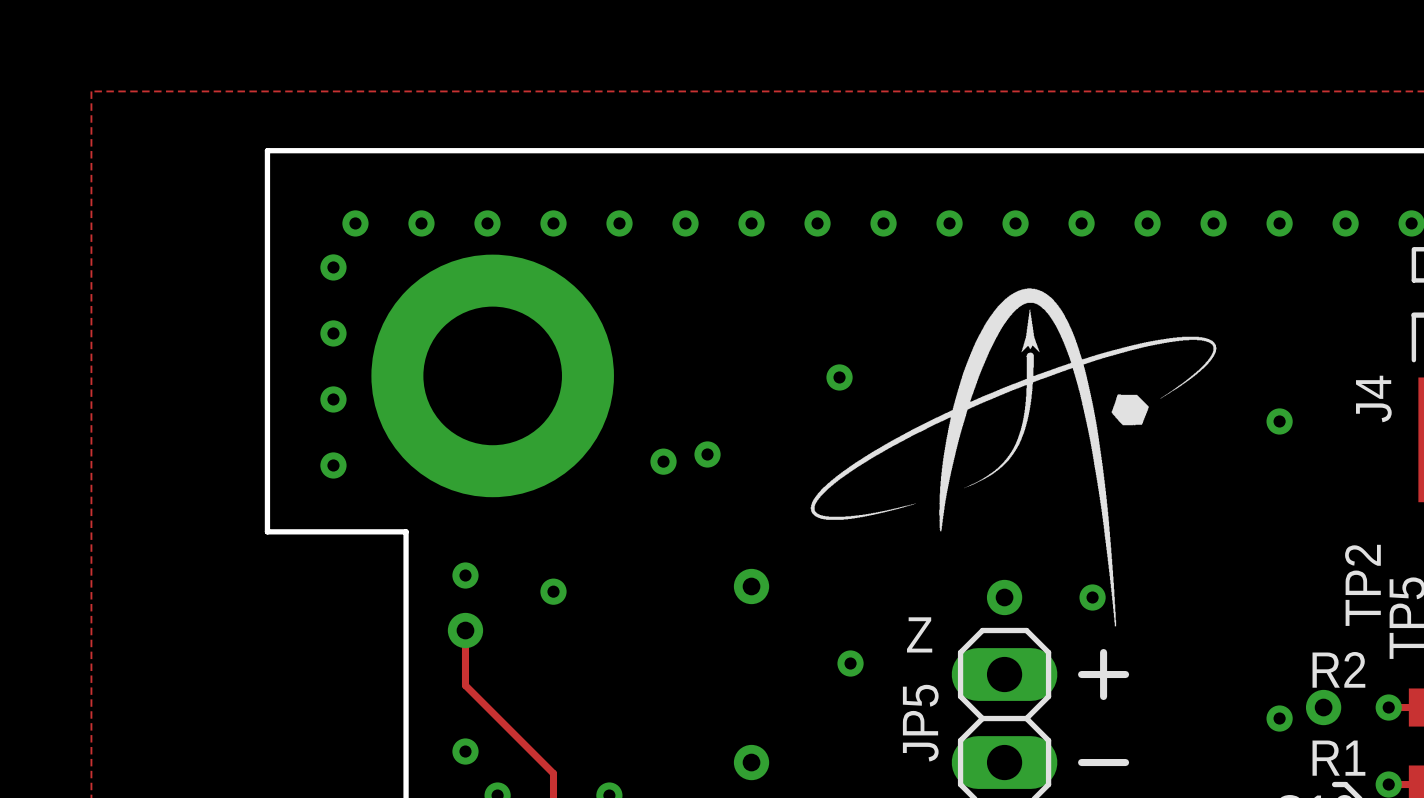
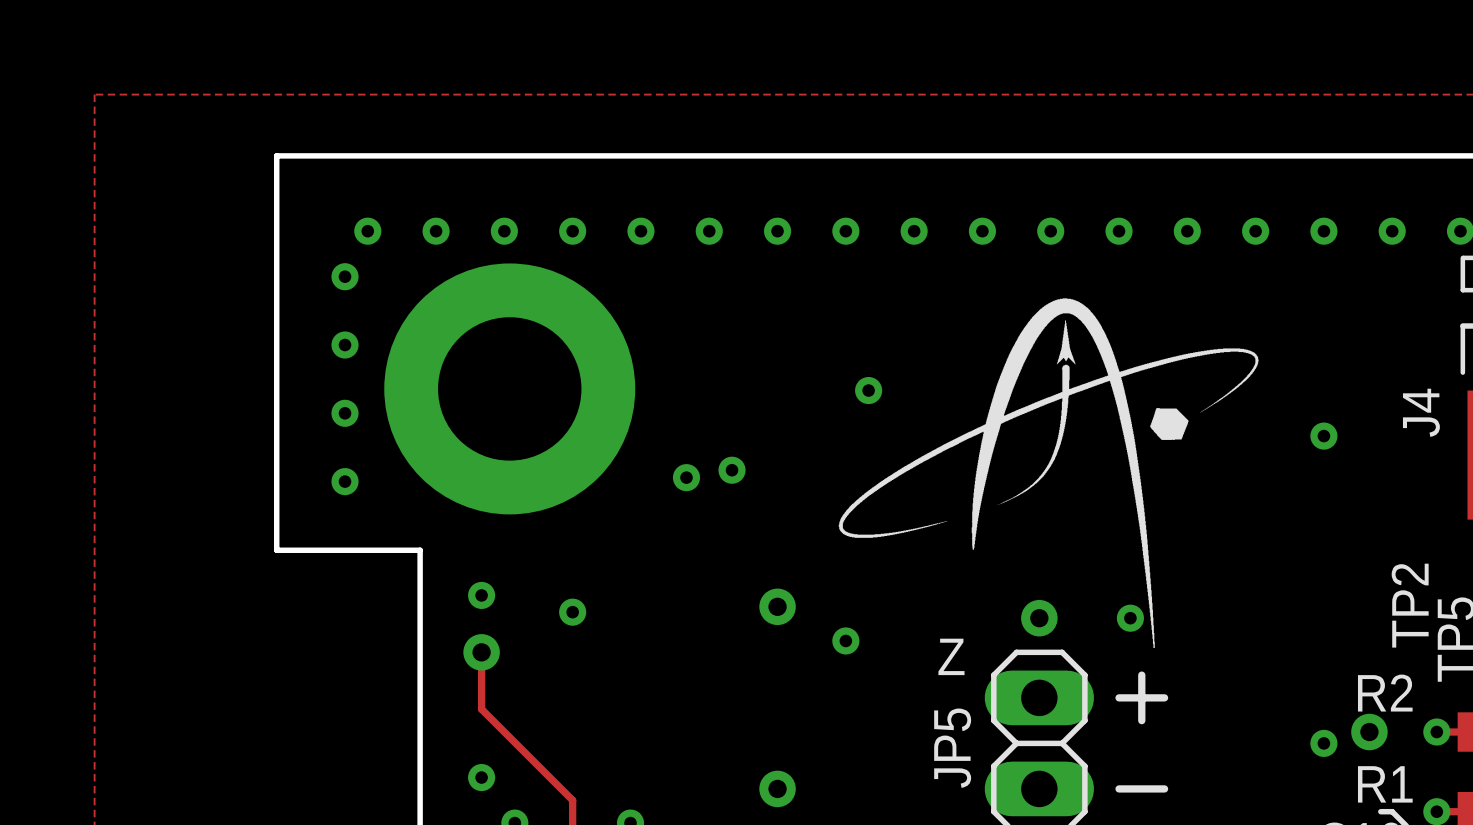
via position: (850, 663) -> (845, 640)

